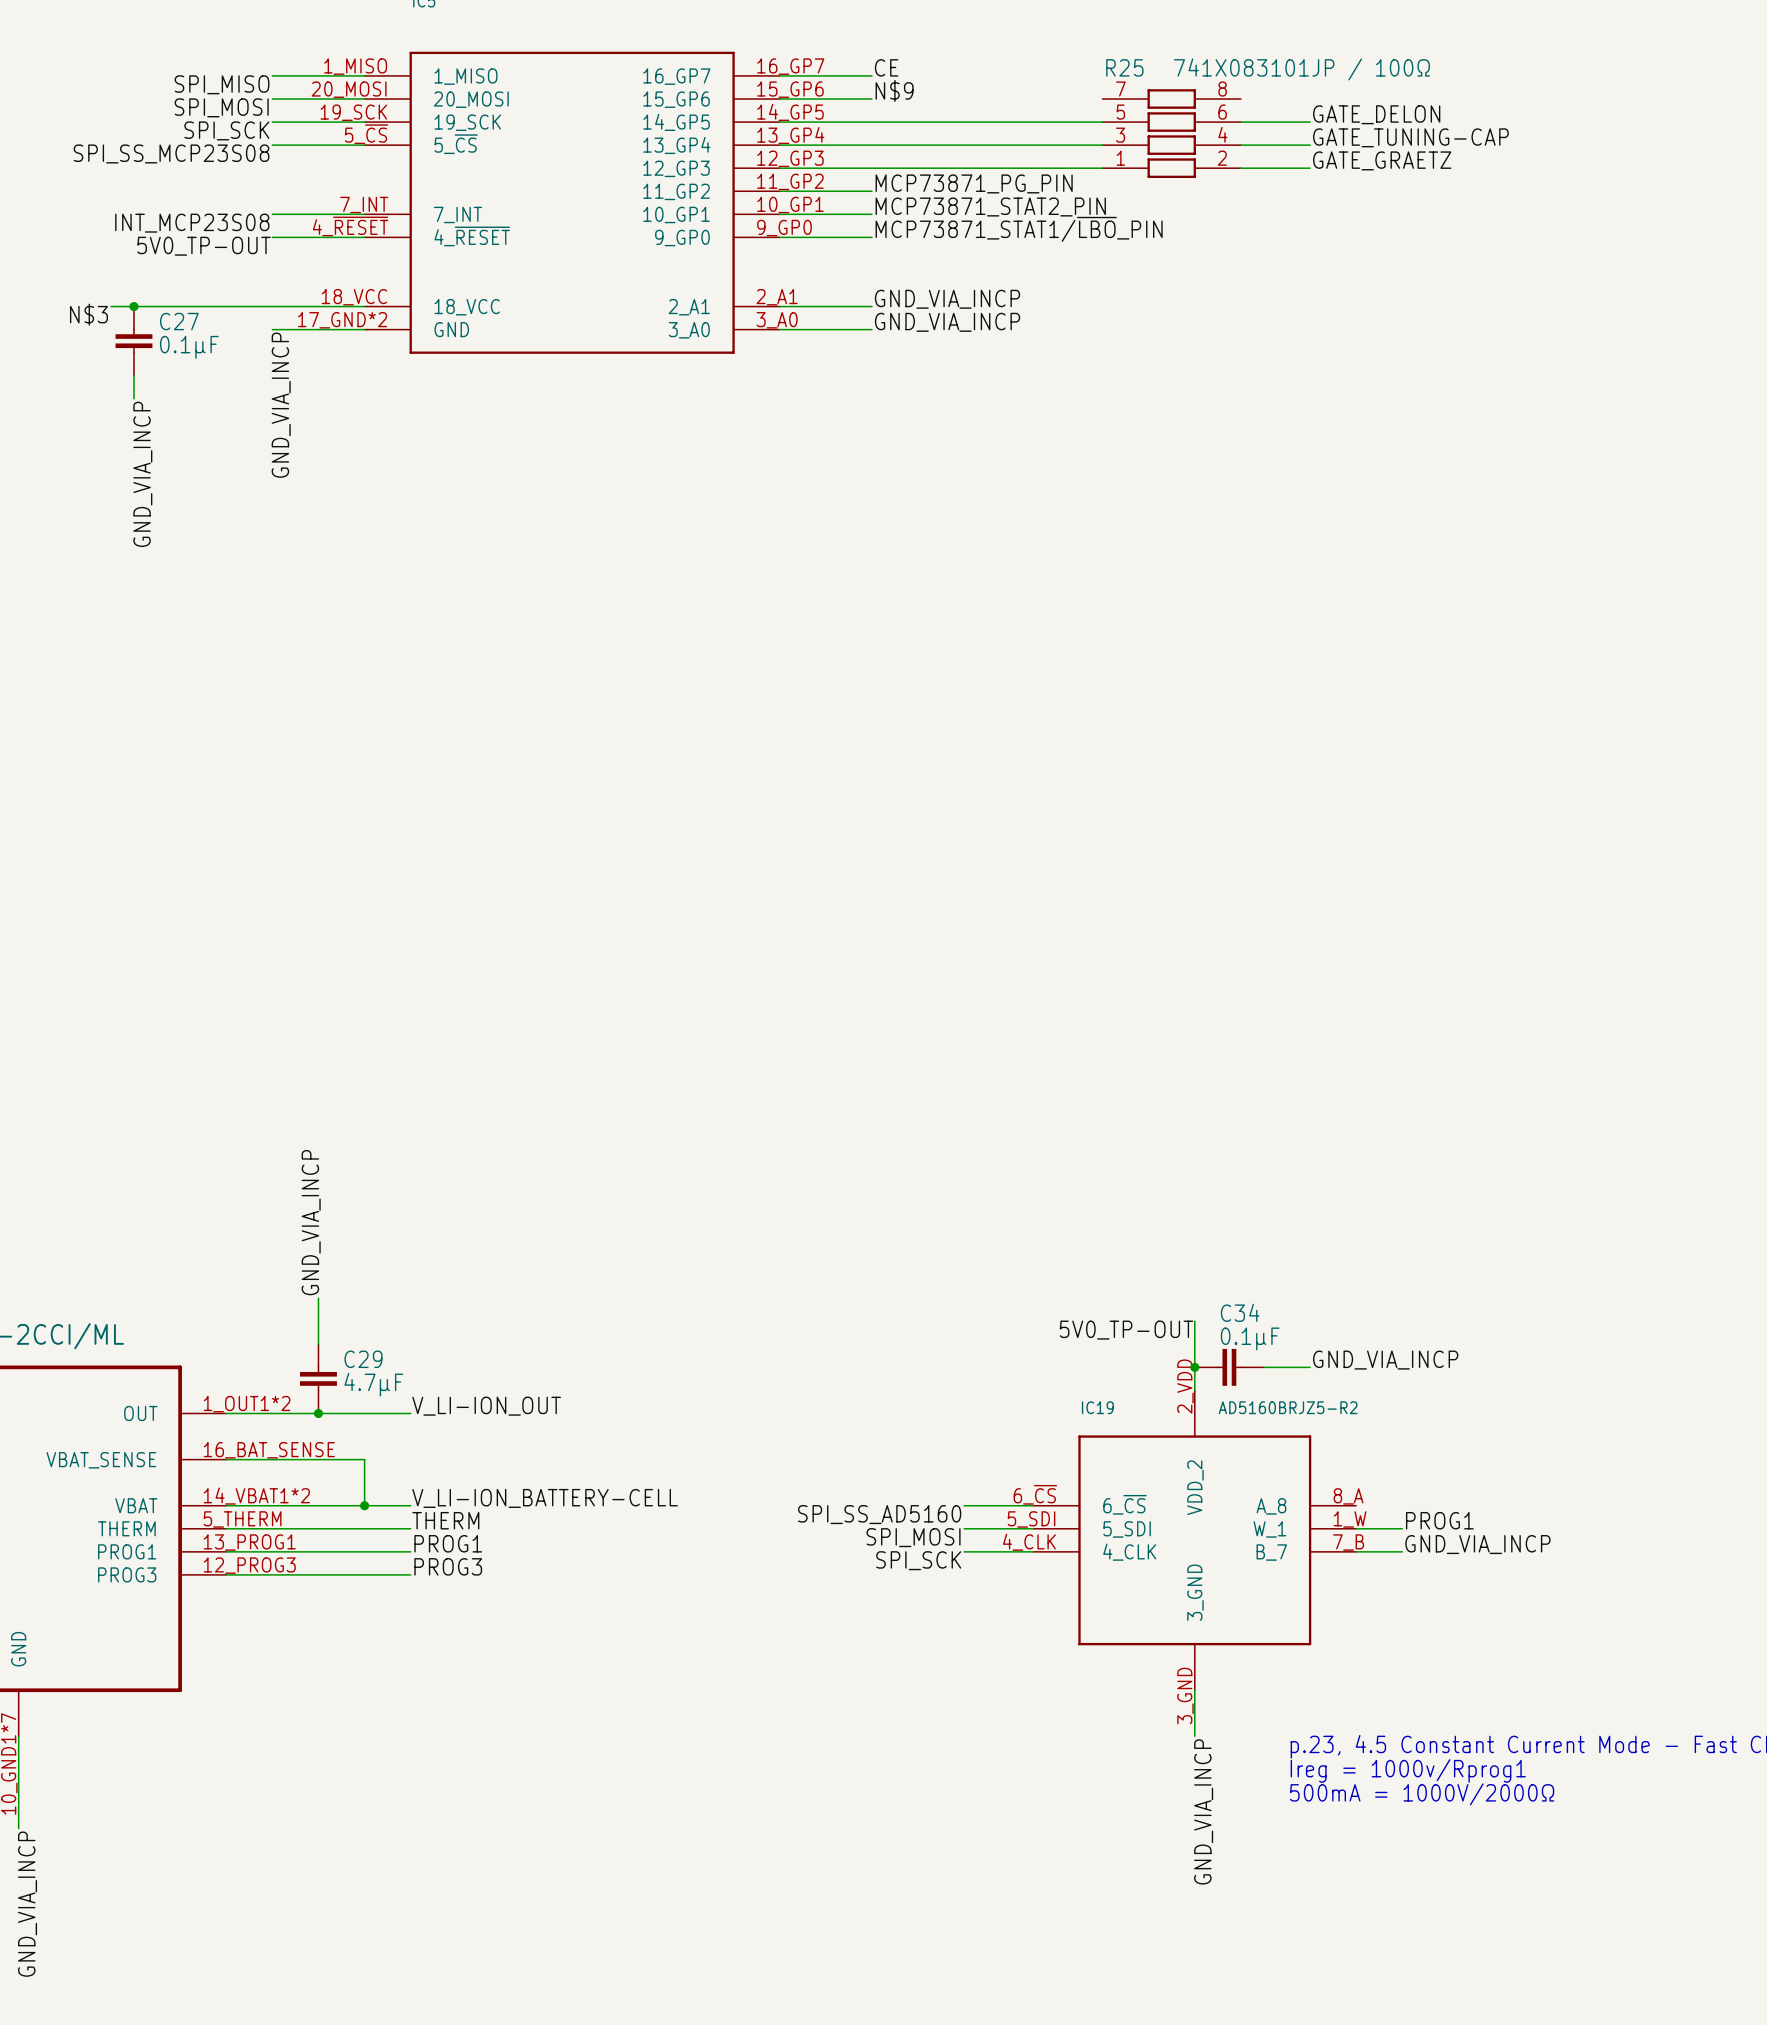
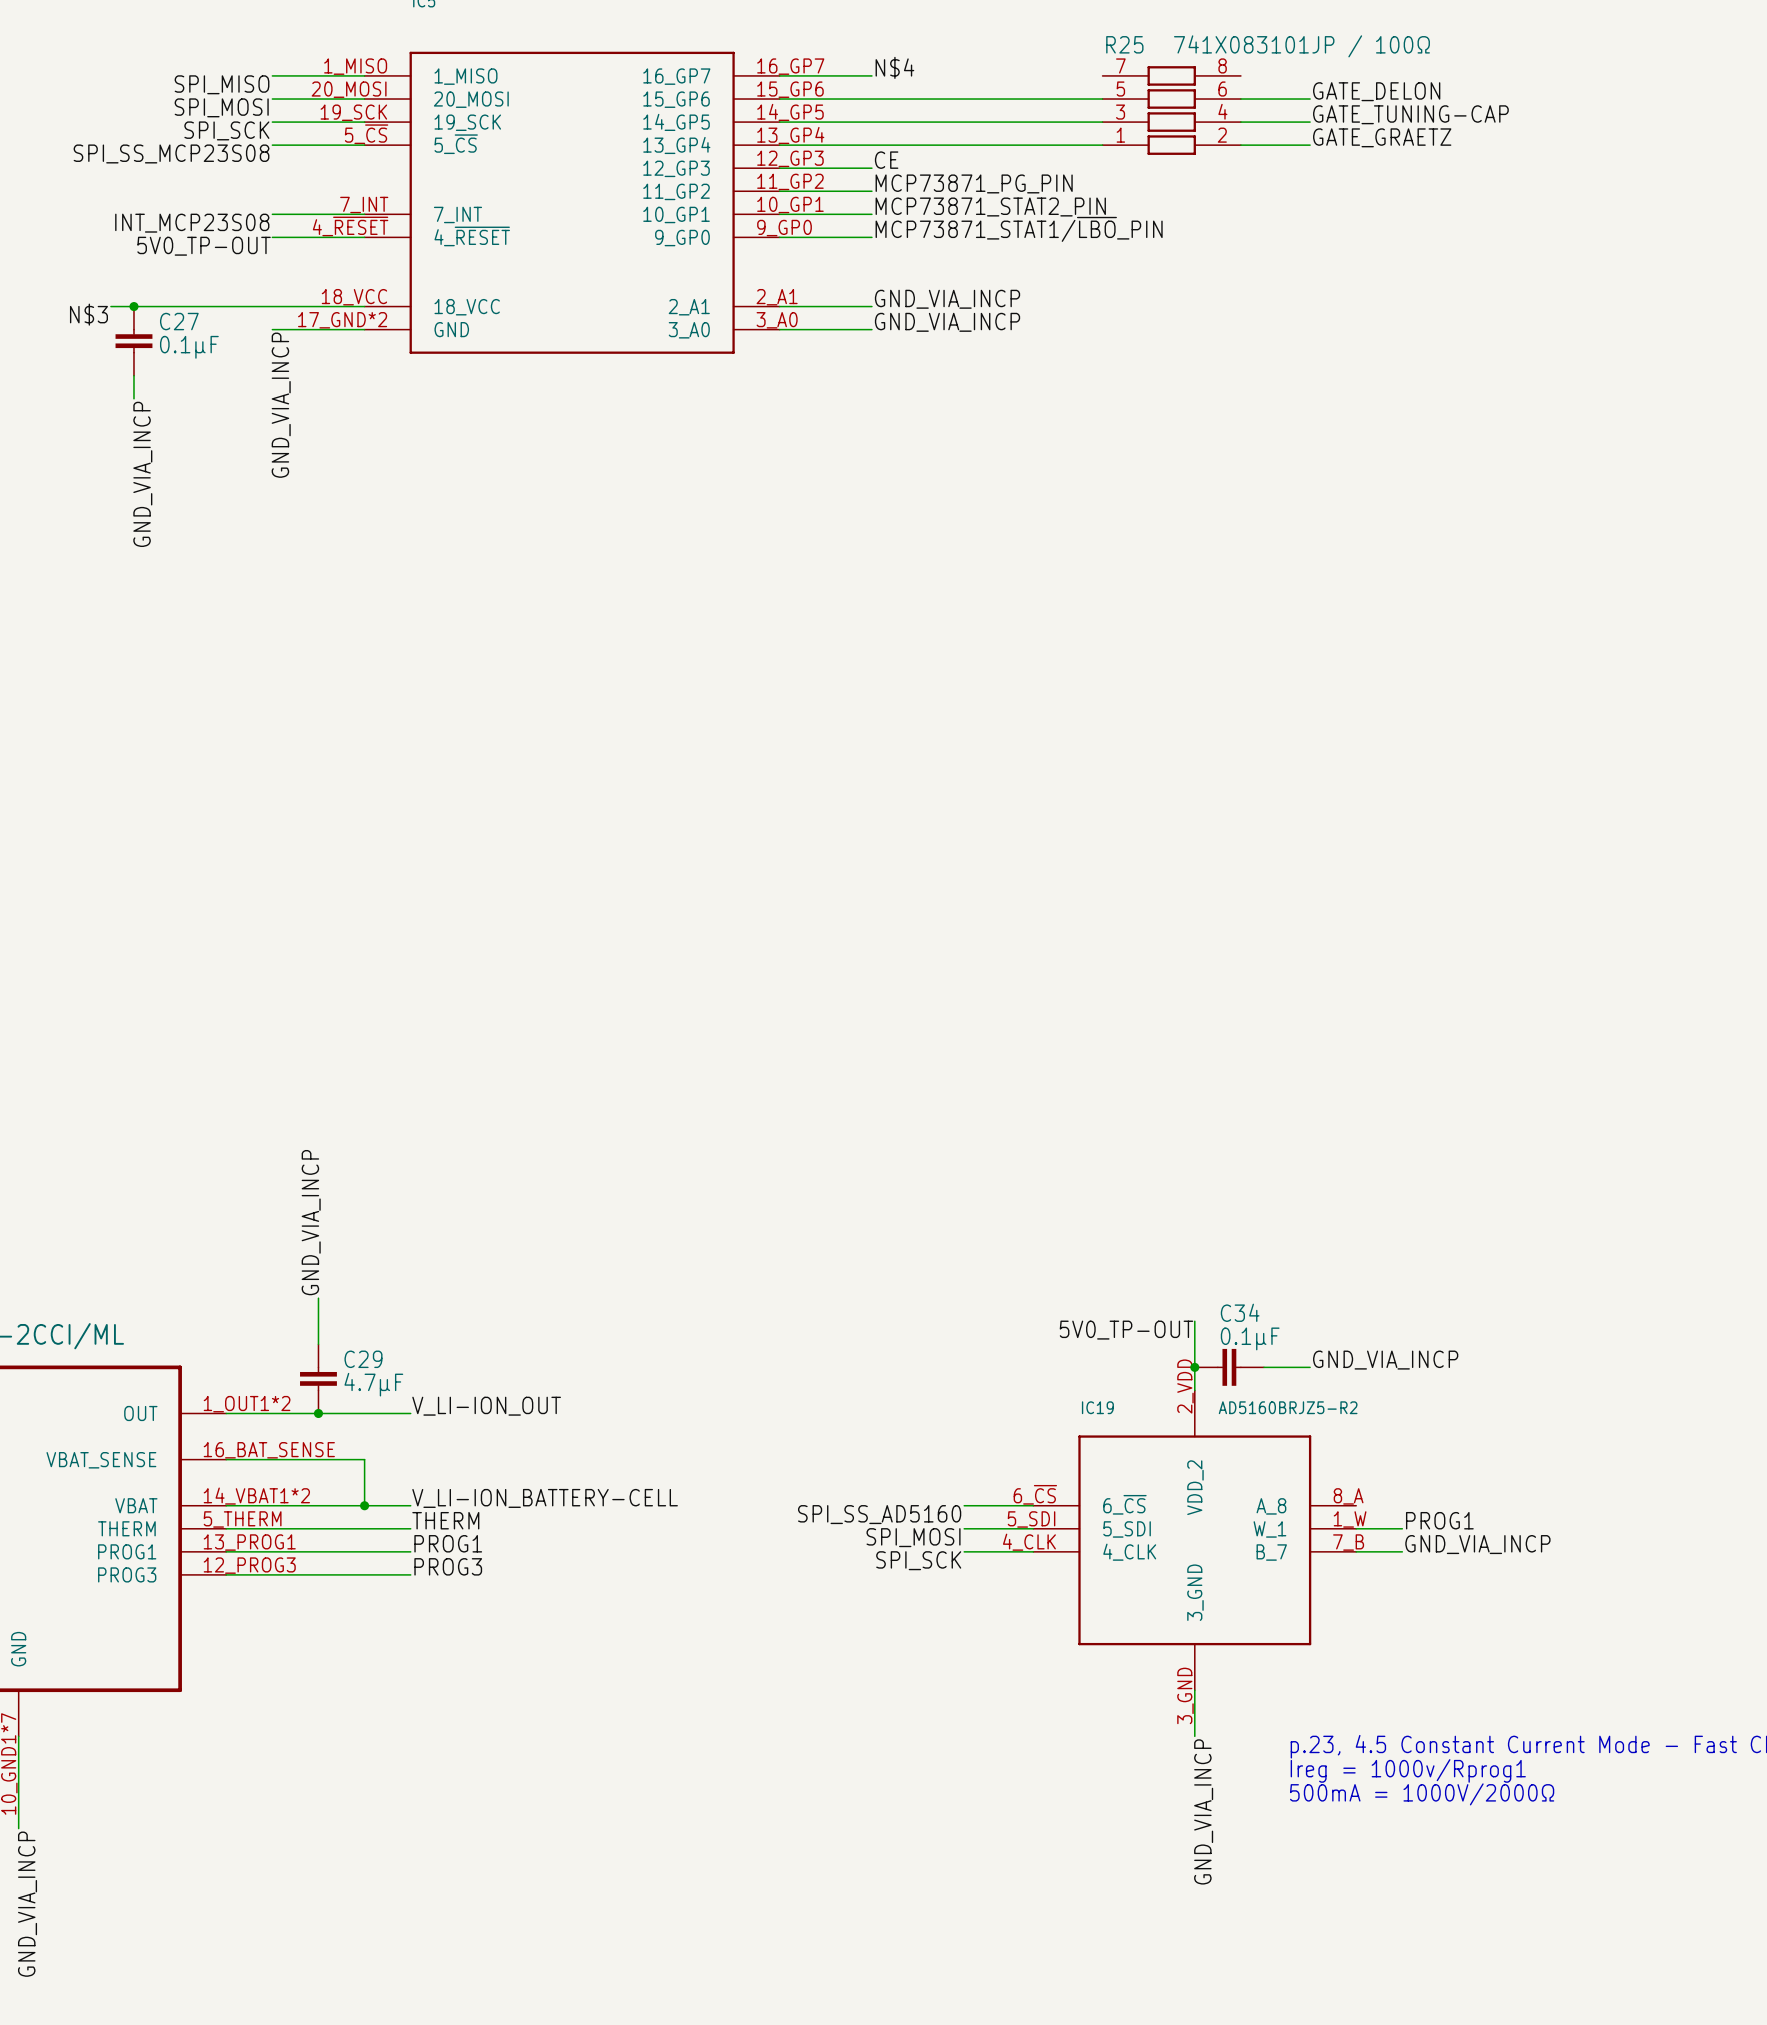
label: CE (886, 67) -> N$4 (894, 67)
label: N$9 (894, 90) -> none
label: none -> GATE_DELON (1376, 91)
label: GATE_DELON (1376, 114) -> GATE_TUNING-CAP (1410, 114)
R25 position: (1171, 133) -> (1171, 110)
label: GATE_TUNING-CAP (1410, 137) -> GATE_GRAETZ (1382, 137)
label: none -> CE (886, 160)
label: GATE_GRAETZ (1382, 160) -> none
wire: (871, 168) (1102, 168) -> (871, 99) (1102, 99)
wire: (1240, 168) (1310, 168) -> (1240, 99) (1310, 99)

